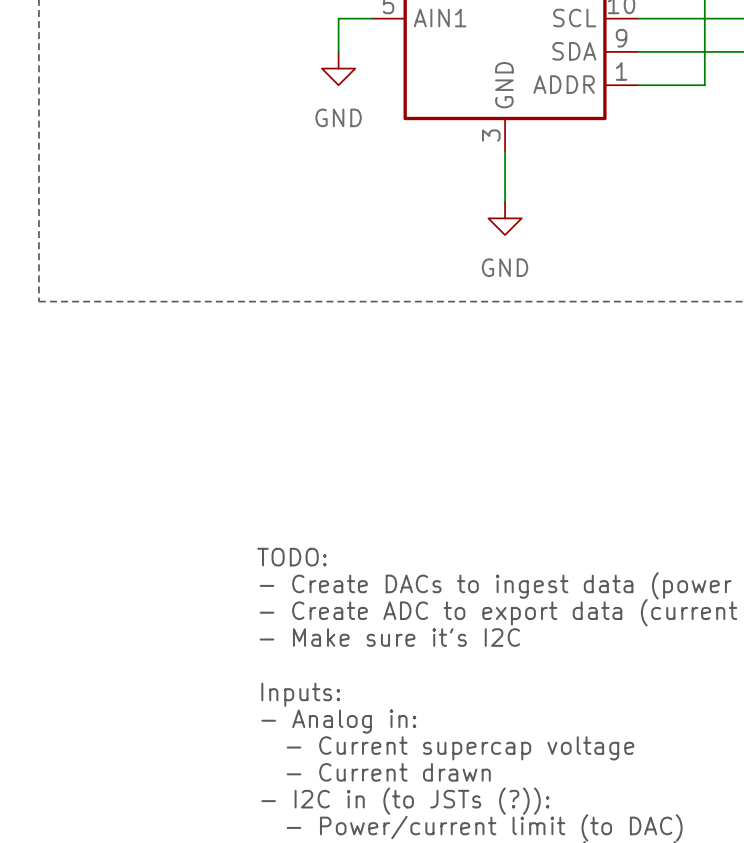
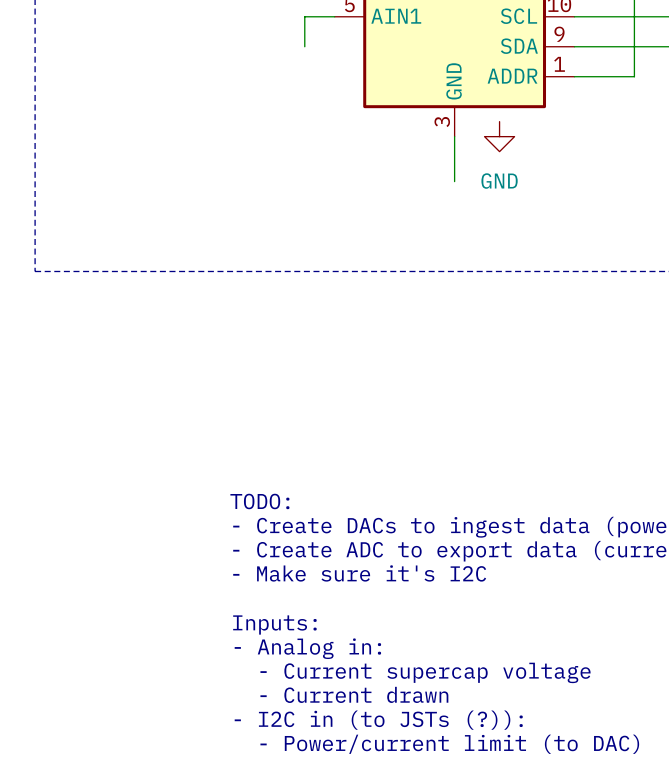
power symbol: GND (338, 68) -> none
power symbol position: GND (505, 218) -> GND (499, 136)

